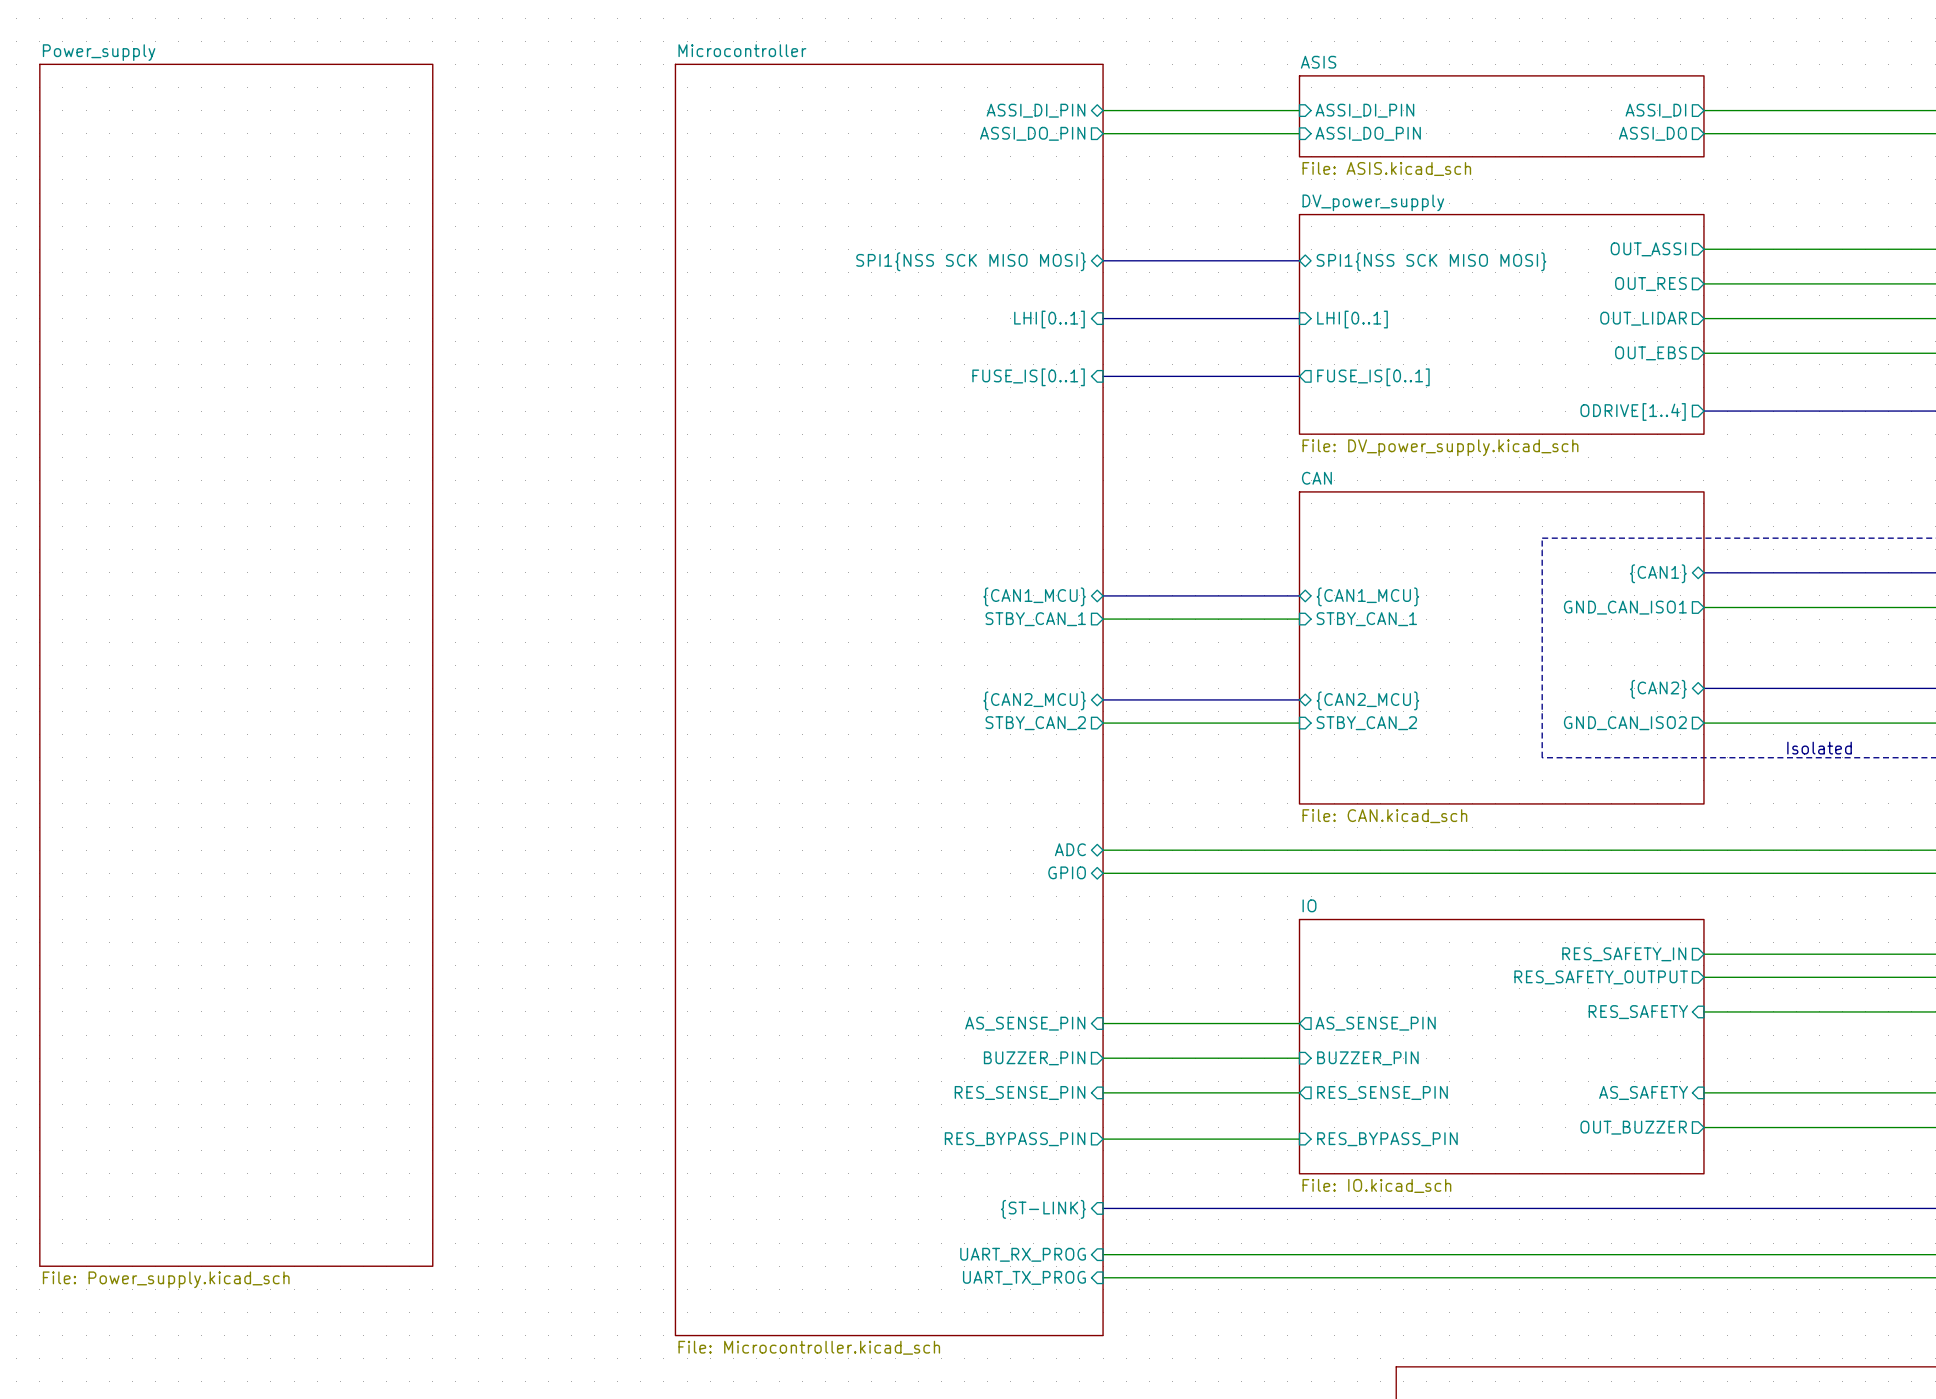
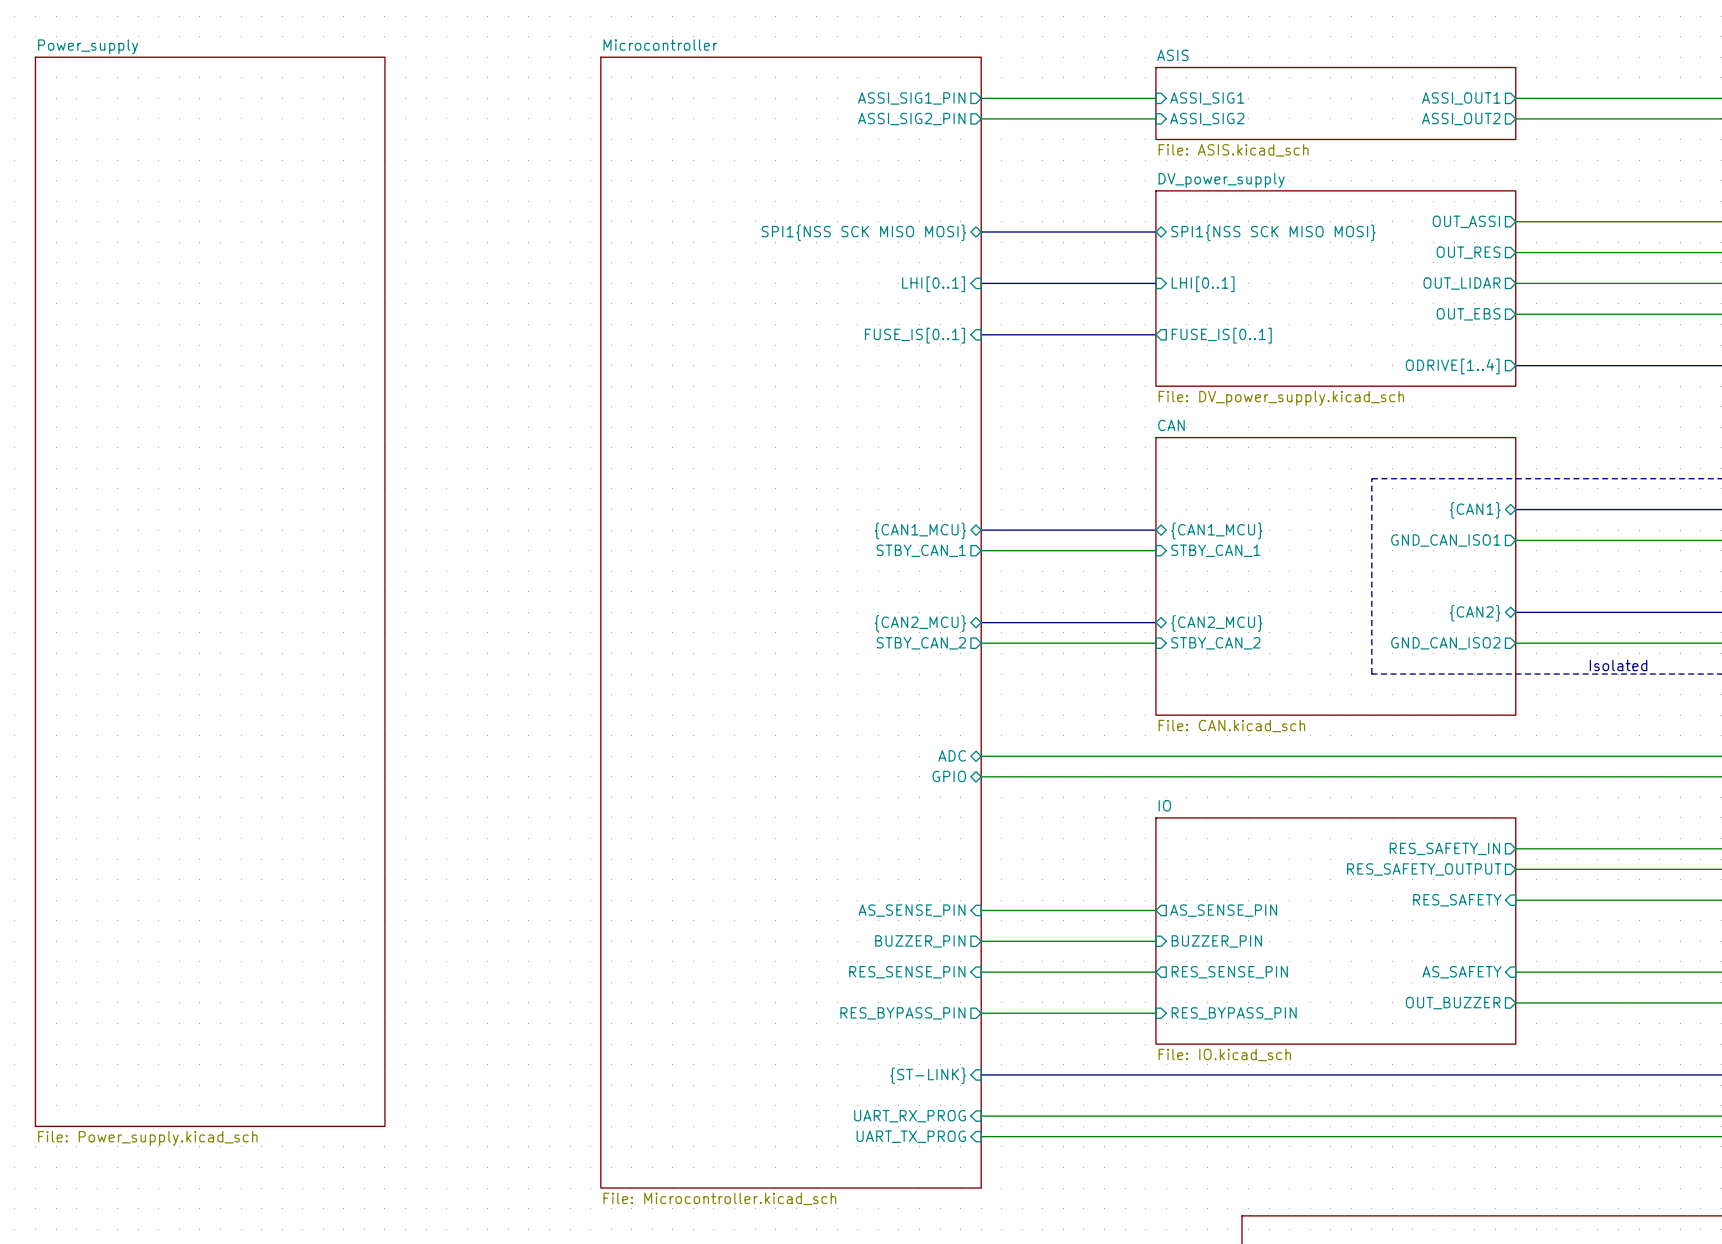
sheet pin shape: bidirectional (1035, 110) -> output (911, 98)
sheet pin: ASSI_DI_PIN (1035, 110) -> ASSI_SIG1_PIN (911, 98)
sheet pin: ASSI_DI_PIN (1364, 110) -> ASSI_SIG1 (1207, 98)
sheet pin: ASSI_DI (1655, 110) -> ASSI_OUT1 (1461, 98)
sheet pin: ASSI_DO_PIN (1032, 133) -> ASSI_SIG2_PIN (911, 119)
sheet pin: ASSI_DO_PIN (1368, 133) -> ASSI_SIG2 (1207, 119)
sheet pin: ASSI_DO (1652, 133) -> ASSI_OUT2 (1461, 119)

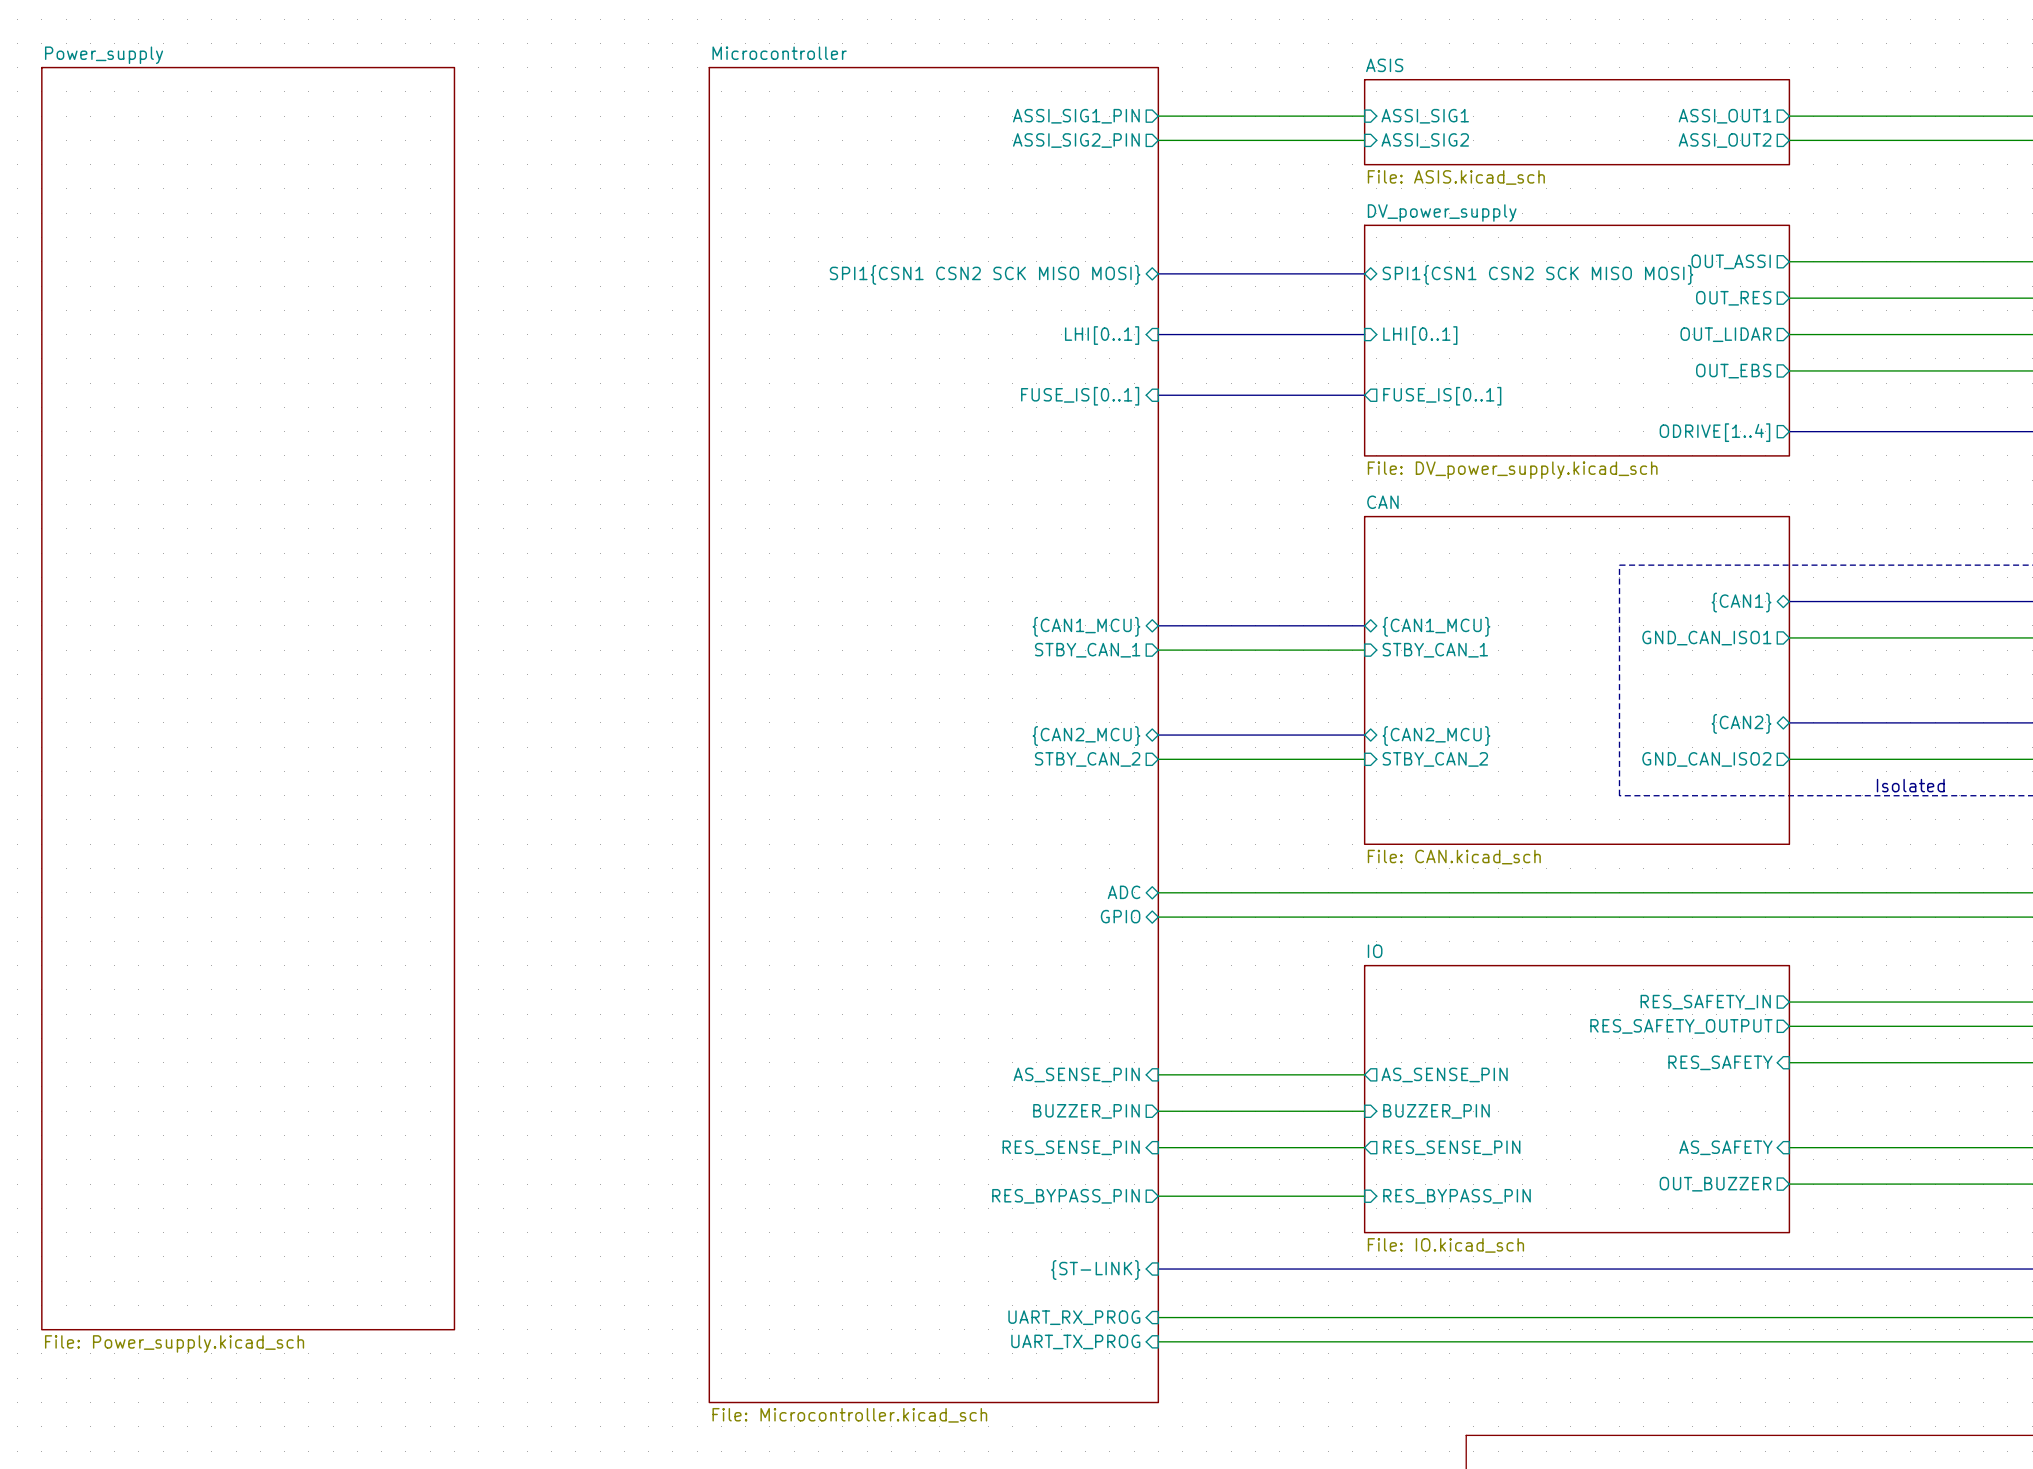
sheet pin: SPI1{NSS SCK MISO MOSI} (863, 232) -> SPI1{CSN1 CSN2 SCK MISO MOSI} (985, 274)
sheet pin: SPI1{NSS SCK MISO MOSI} (1273, 232) -> SPI1{CSN1 CSN2 SCK MISO MOSI} (1537, 274)

